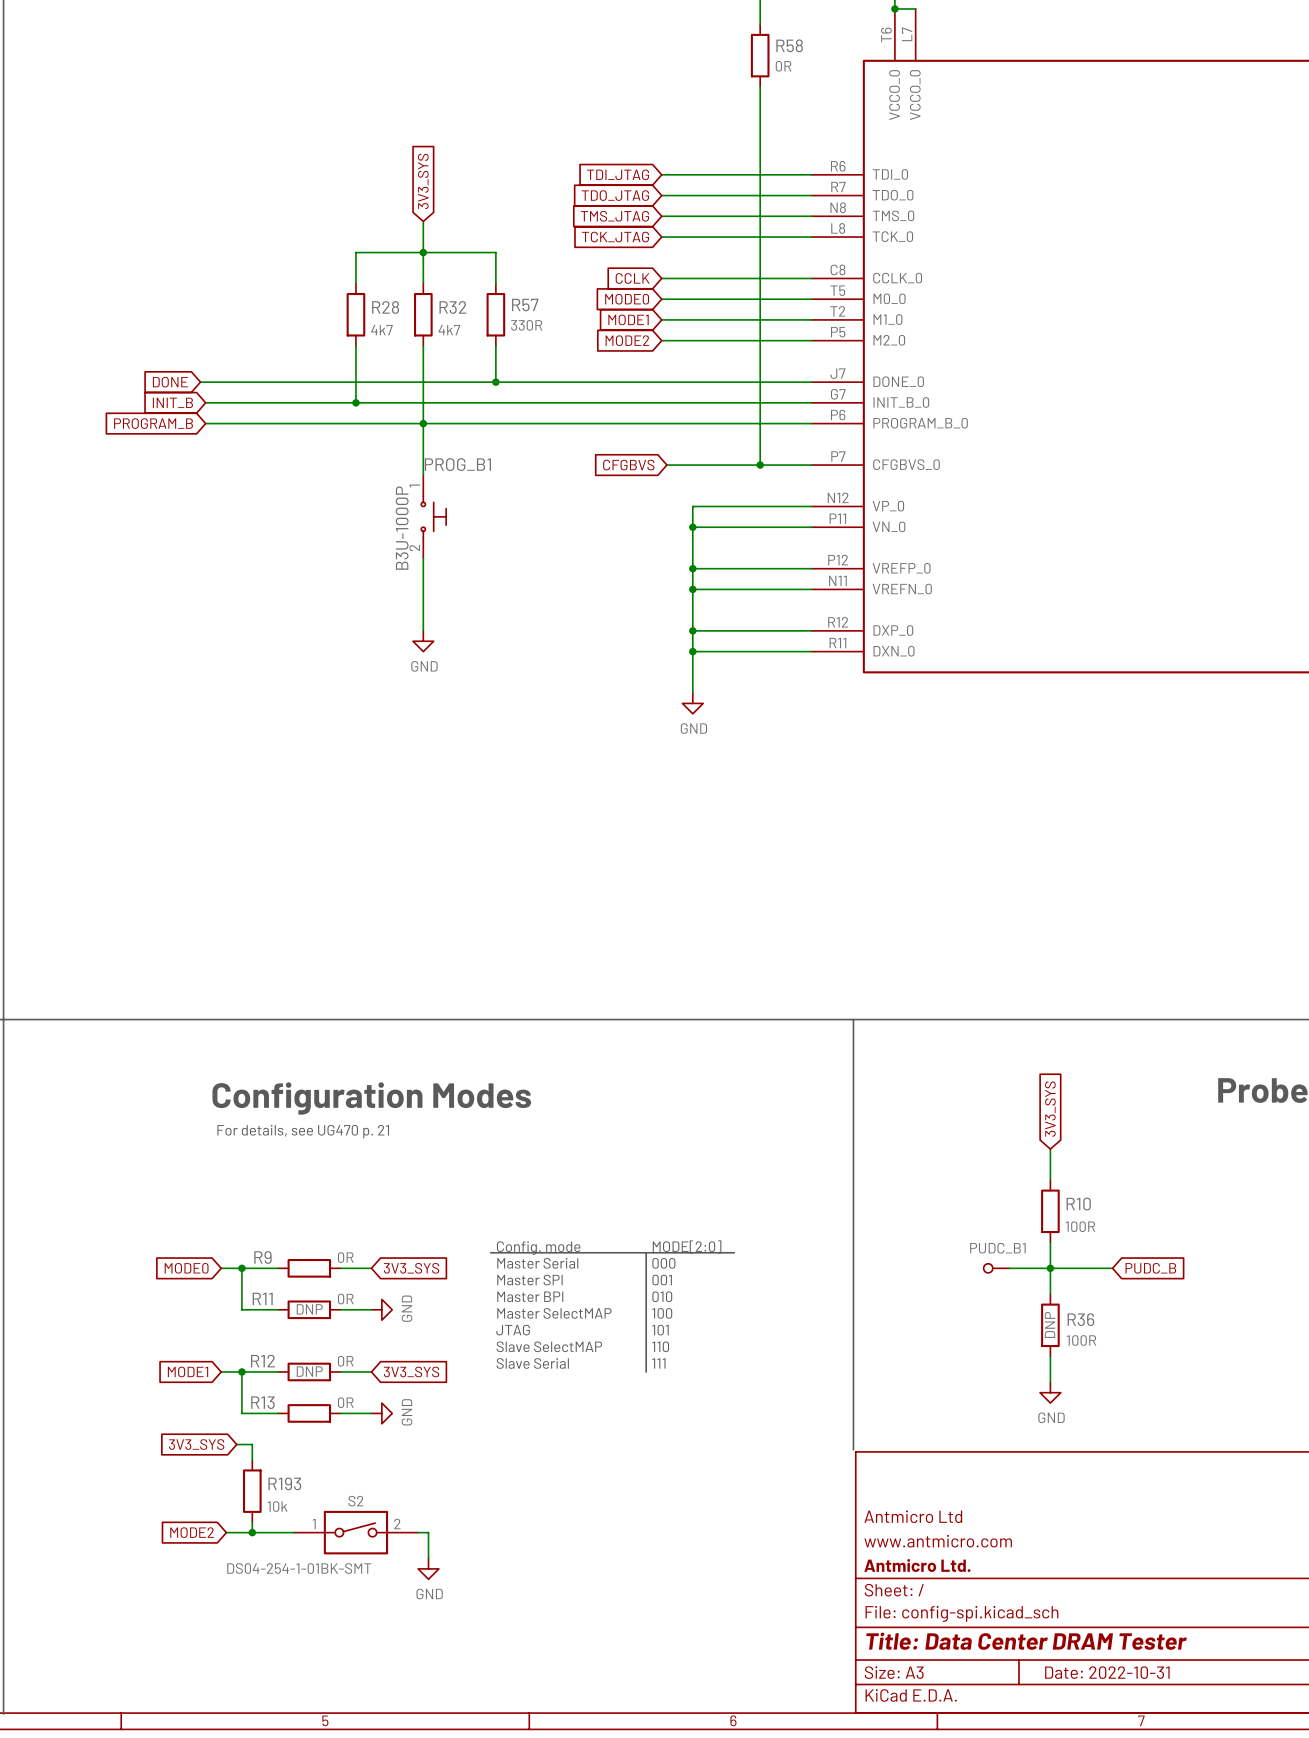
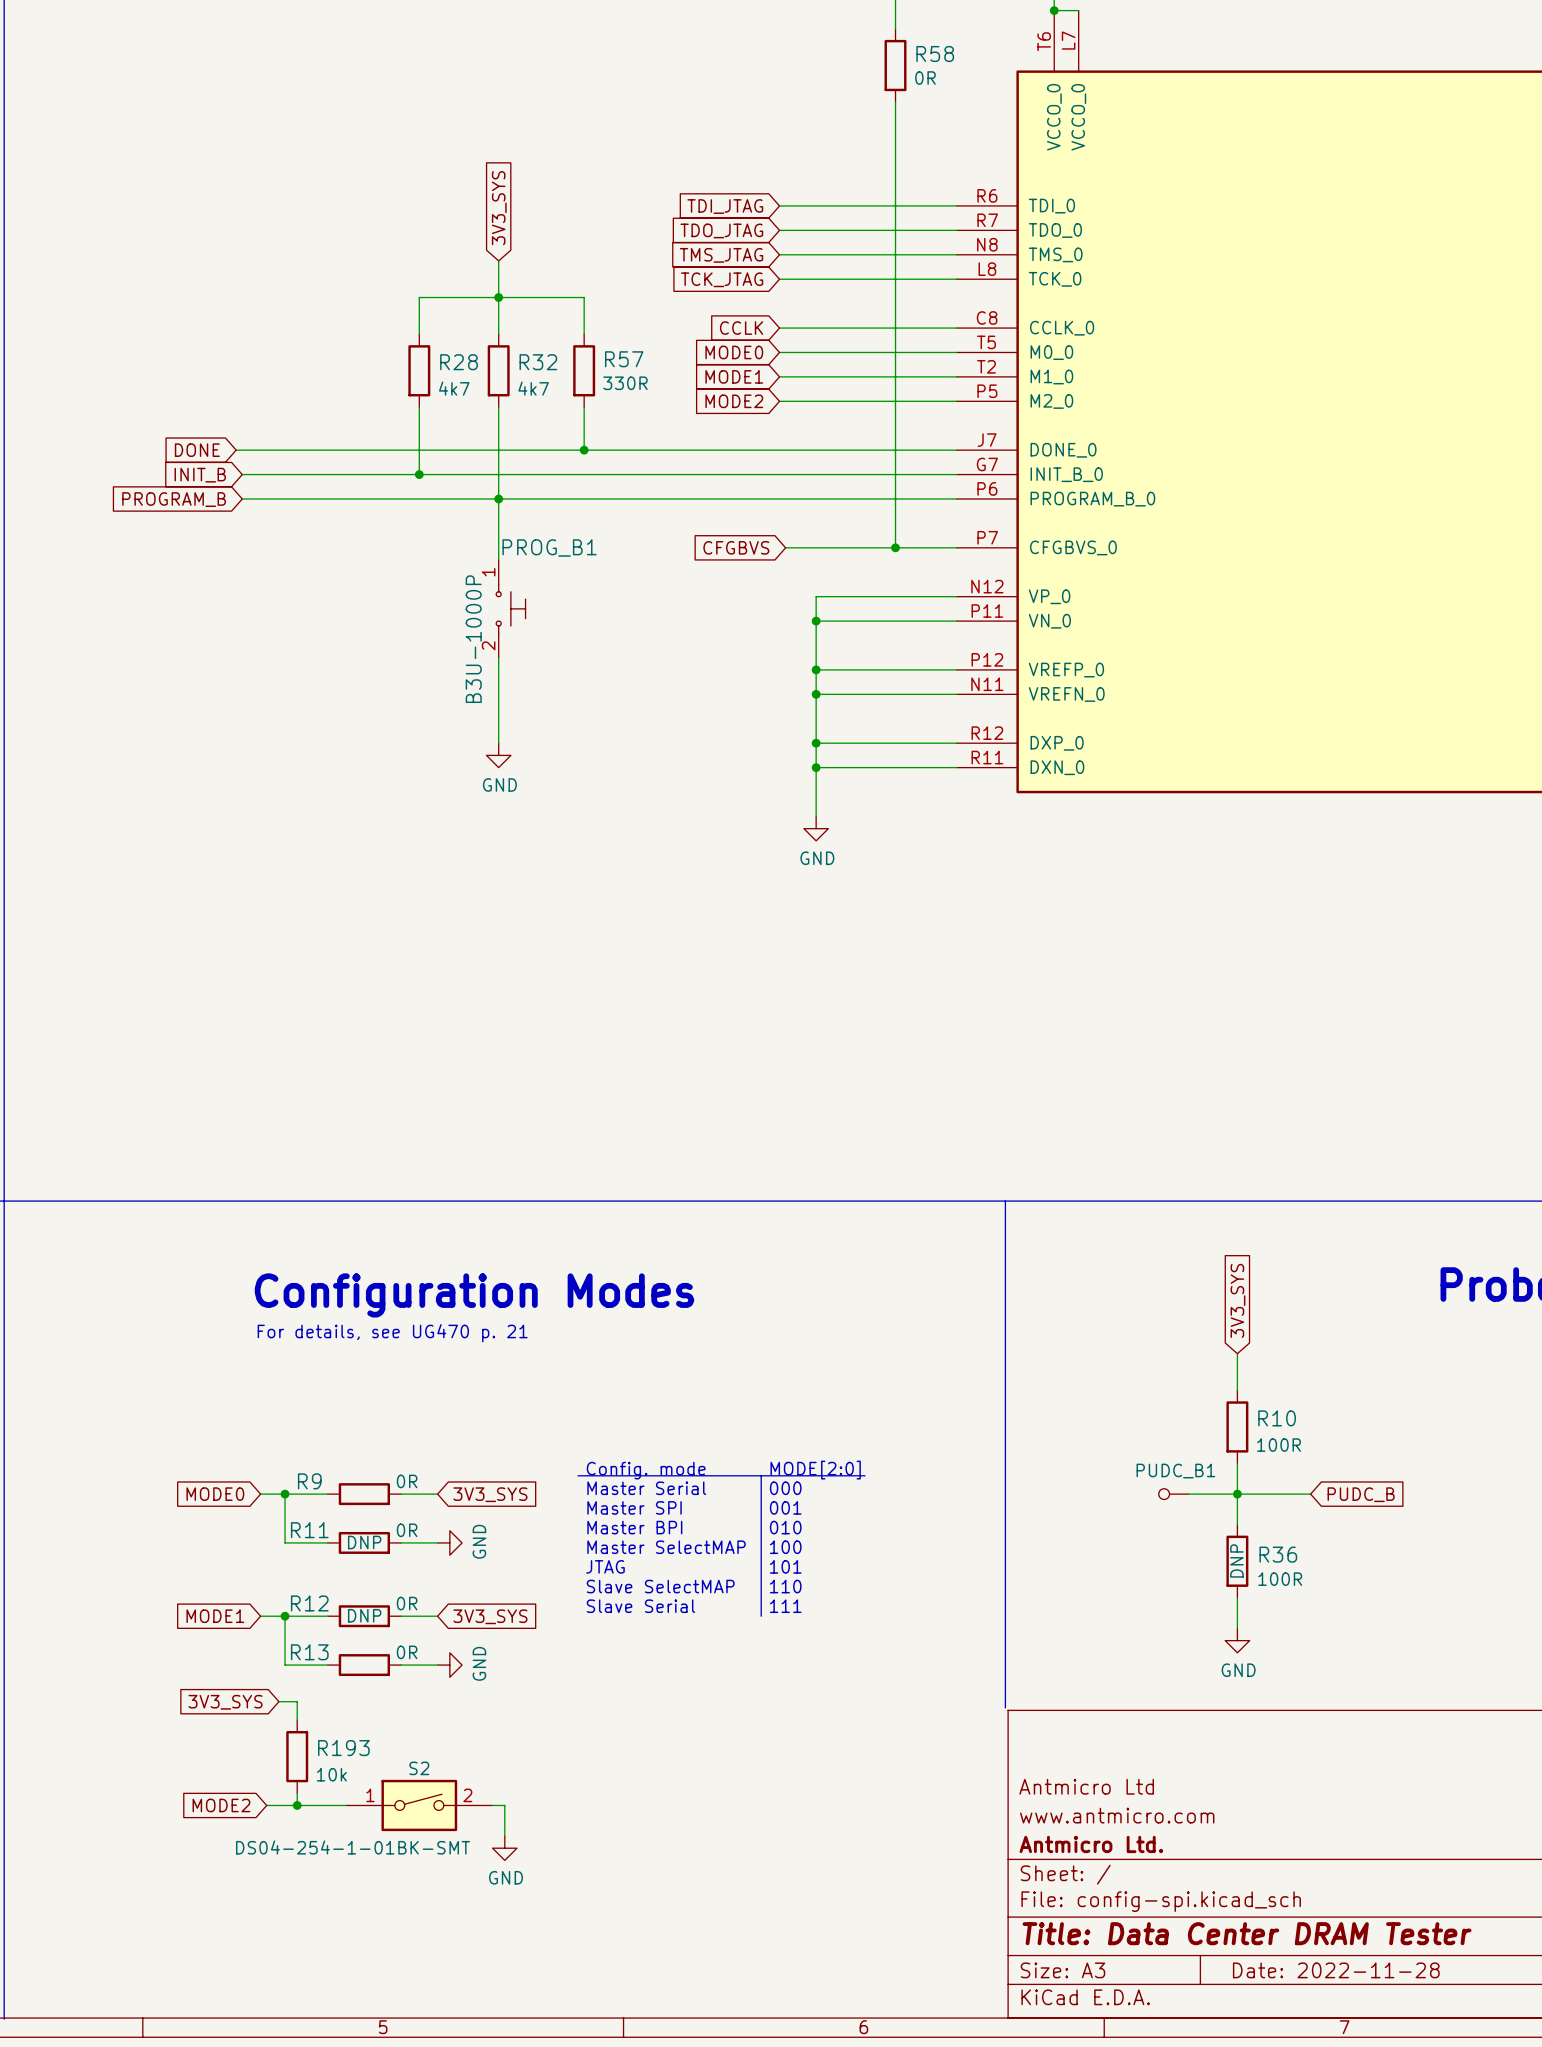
title block: Date: 2022-10-31 (1107, 1672) -> Date: 2022-11-28 (1336, 1970)

